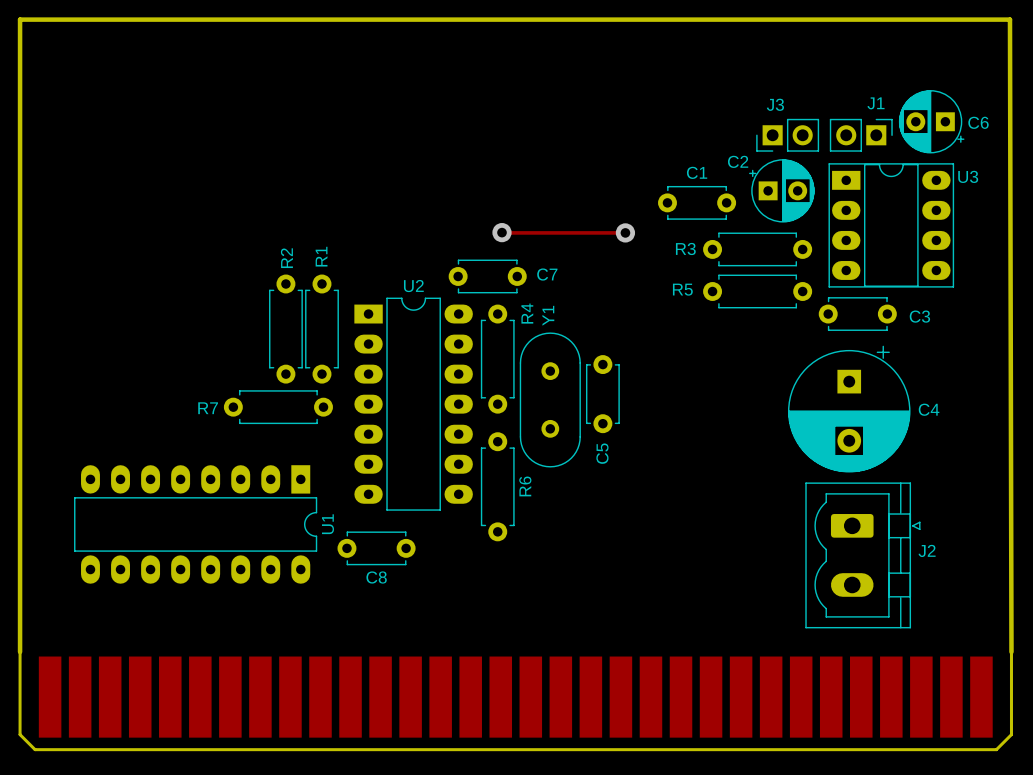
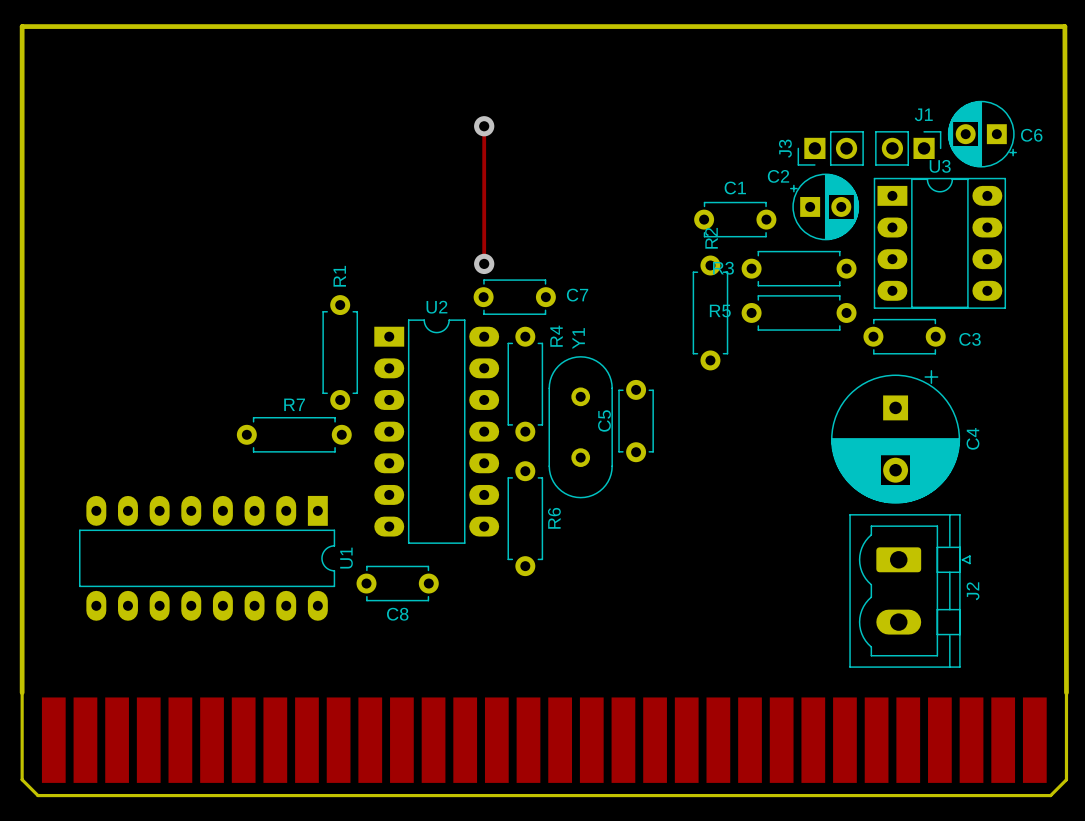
J3 name rotation: 0° (775, 104) -> 90° counterclockwise (785, 148)
J3 name position: J3 (775, 104) -> J3 (785, 148)
track: none -> (484, 126) (484, 263)
via: none -> (484, 126)
U3 name position: U3 (968, 176) -> U3 (940, 166)
track: (501, 232) (625, 232) -> none
via position: (501, 232) -> (484, 263)
via: (625, 232) -> none
R2 position: (285, 329) -> (710, 312)
R7 name position: R7 (208, 408) -> R7 (294, 404)
C4 name rotation: 0° (929, 409) -> 90° counterclockwise (972, 438)
C5 name position: C5 (602, 453) -> C5 (604, 420)
J2 name rotation: 0° (927, 550) -> 90° counterclockwise (973, 591)

